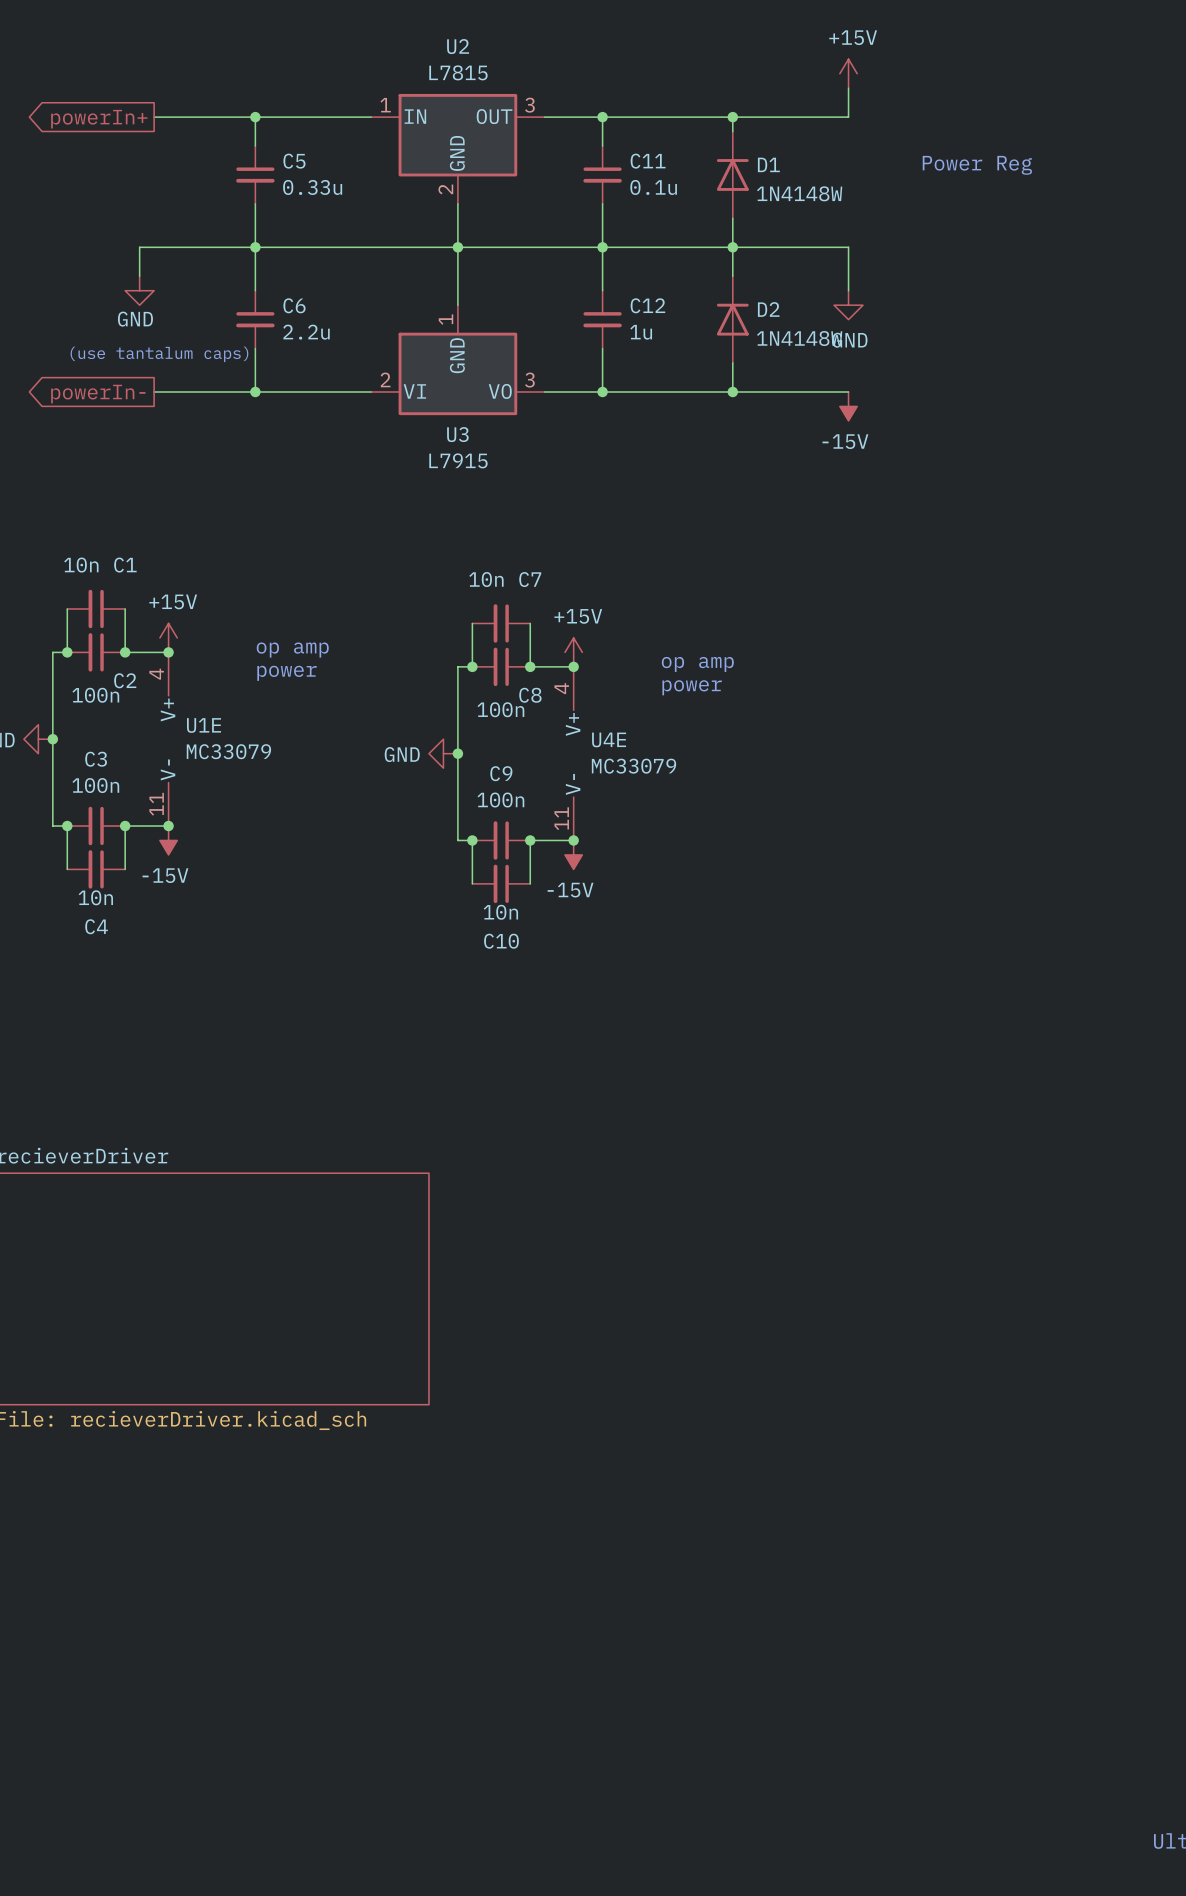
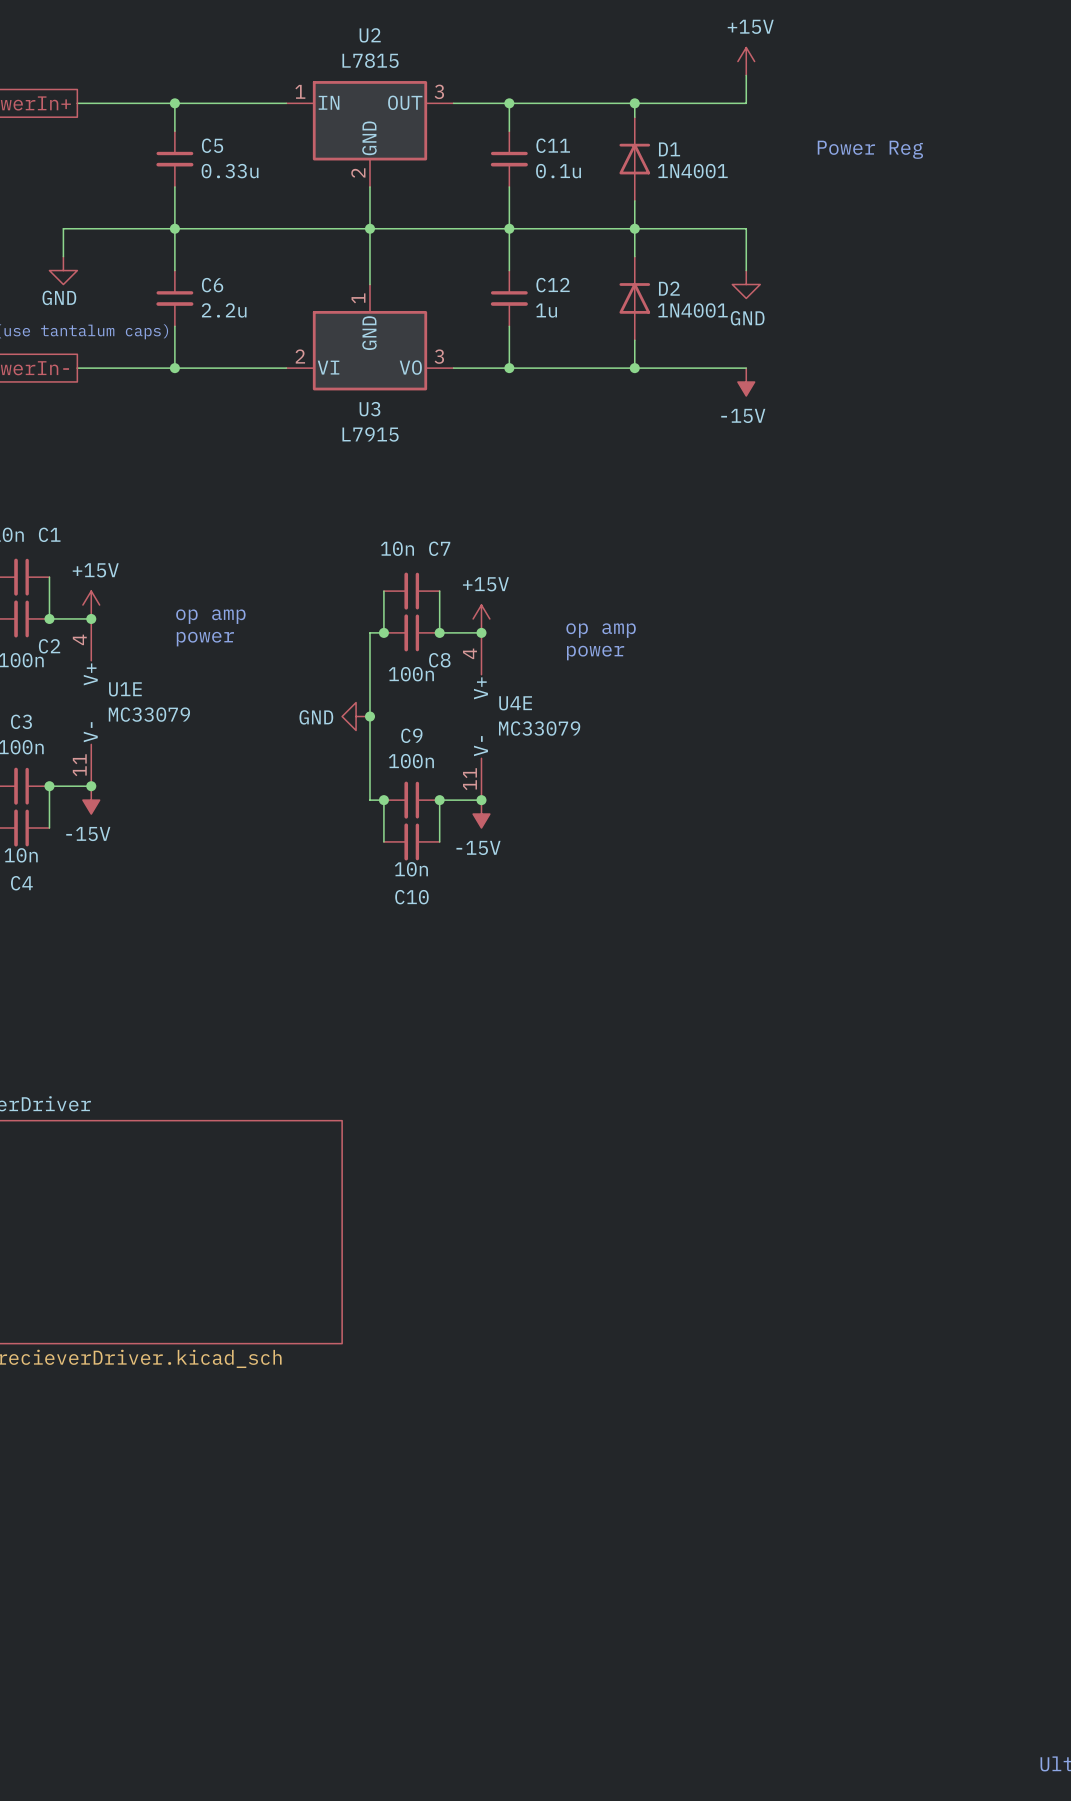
D1 value: 1N4148W (799, 193) -> 1N4001 (692, 171)
D2 value: 1N4148W (799, 338) -> 1N4001 (692, 310)

